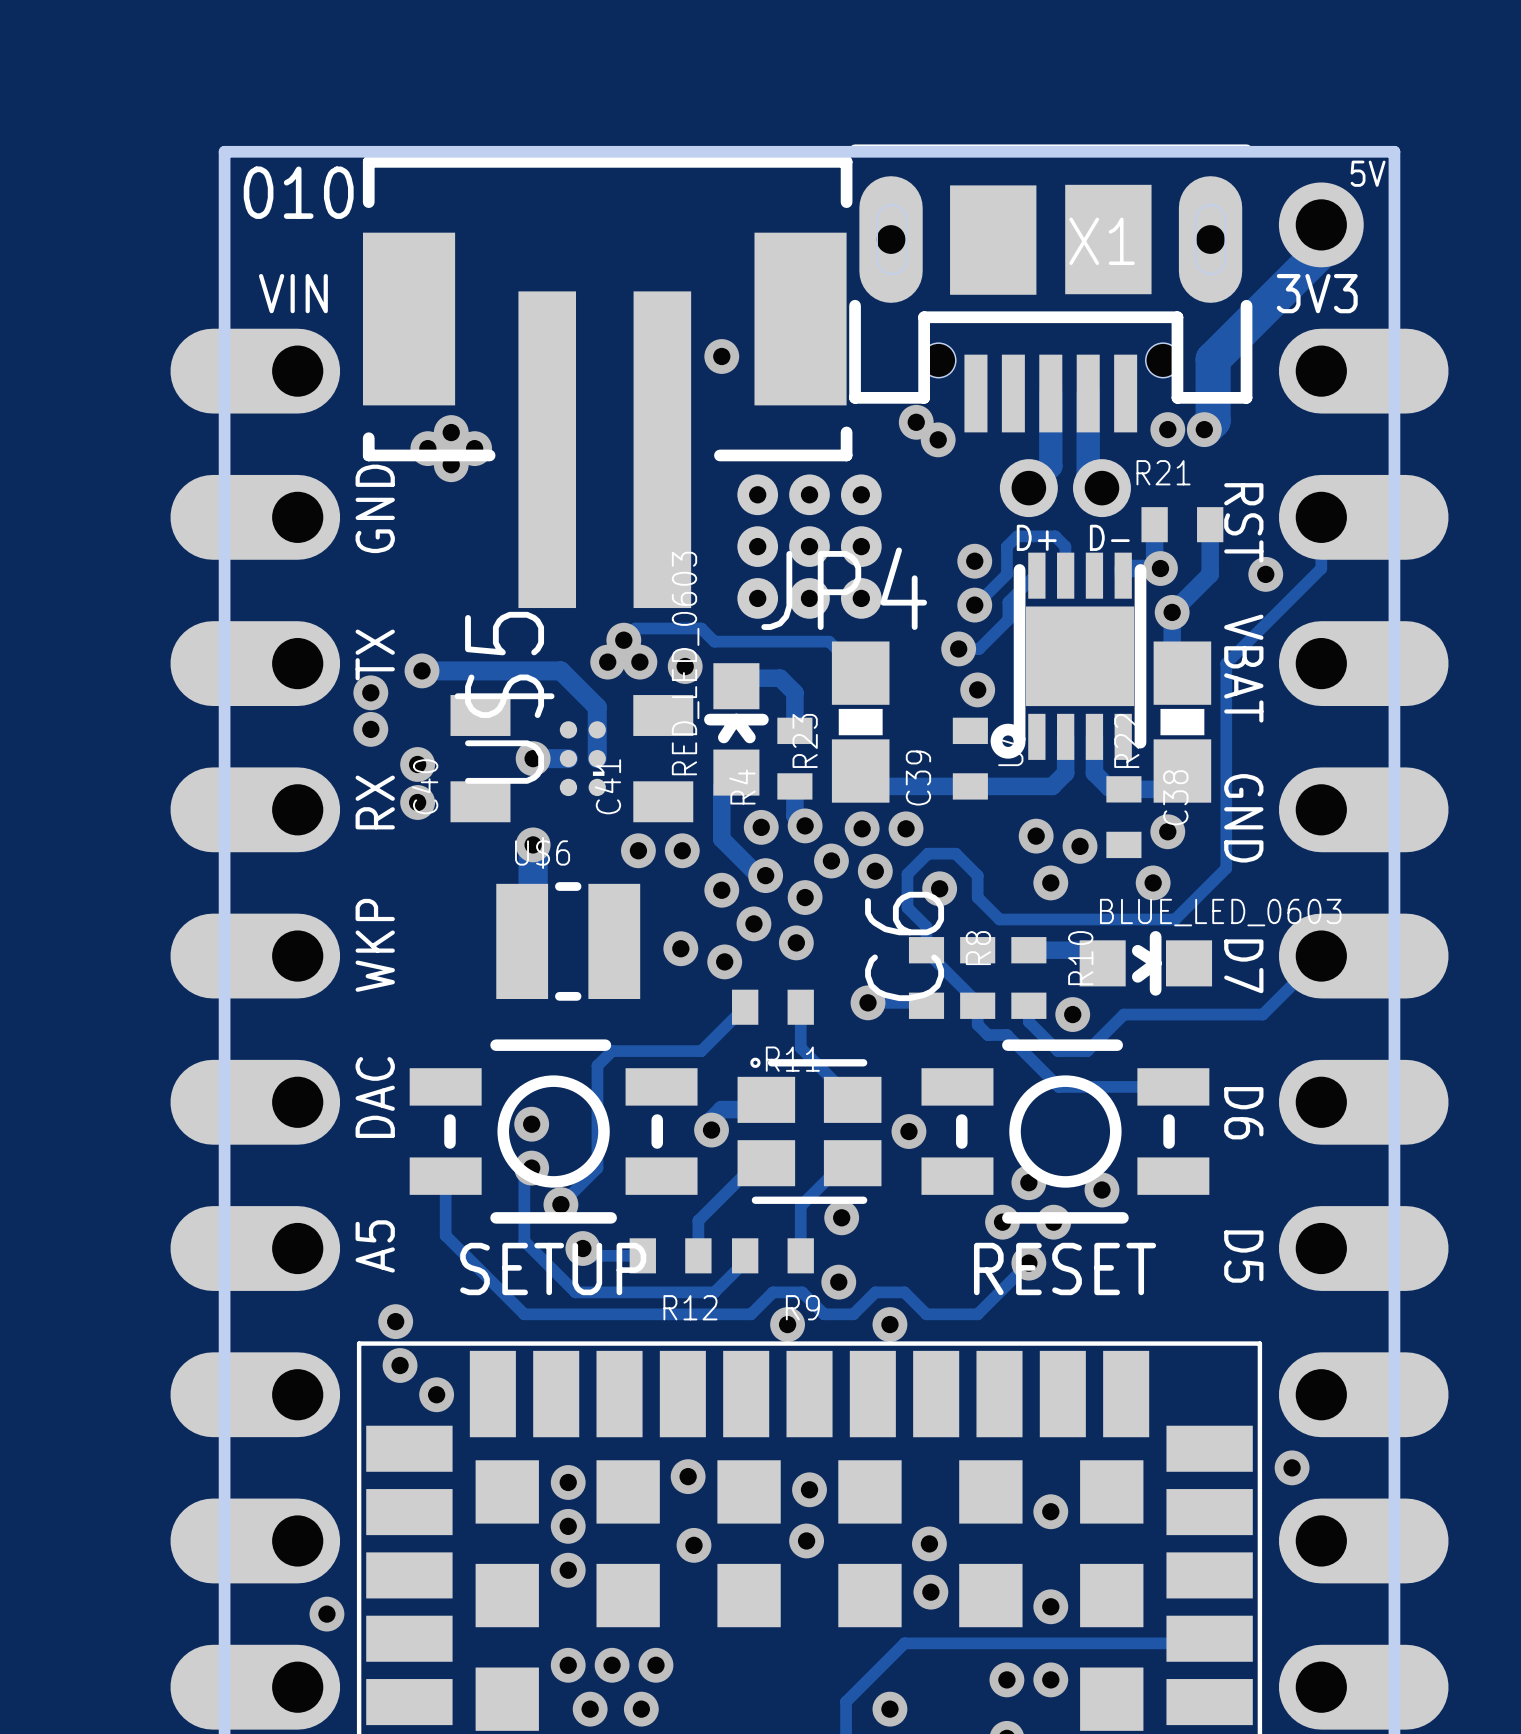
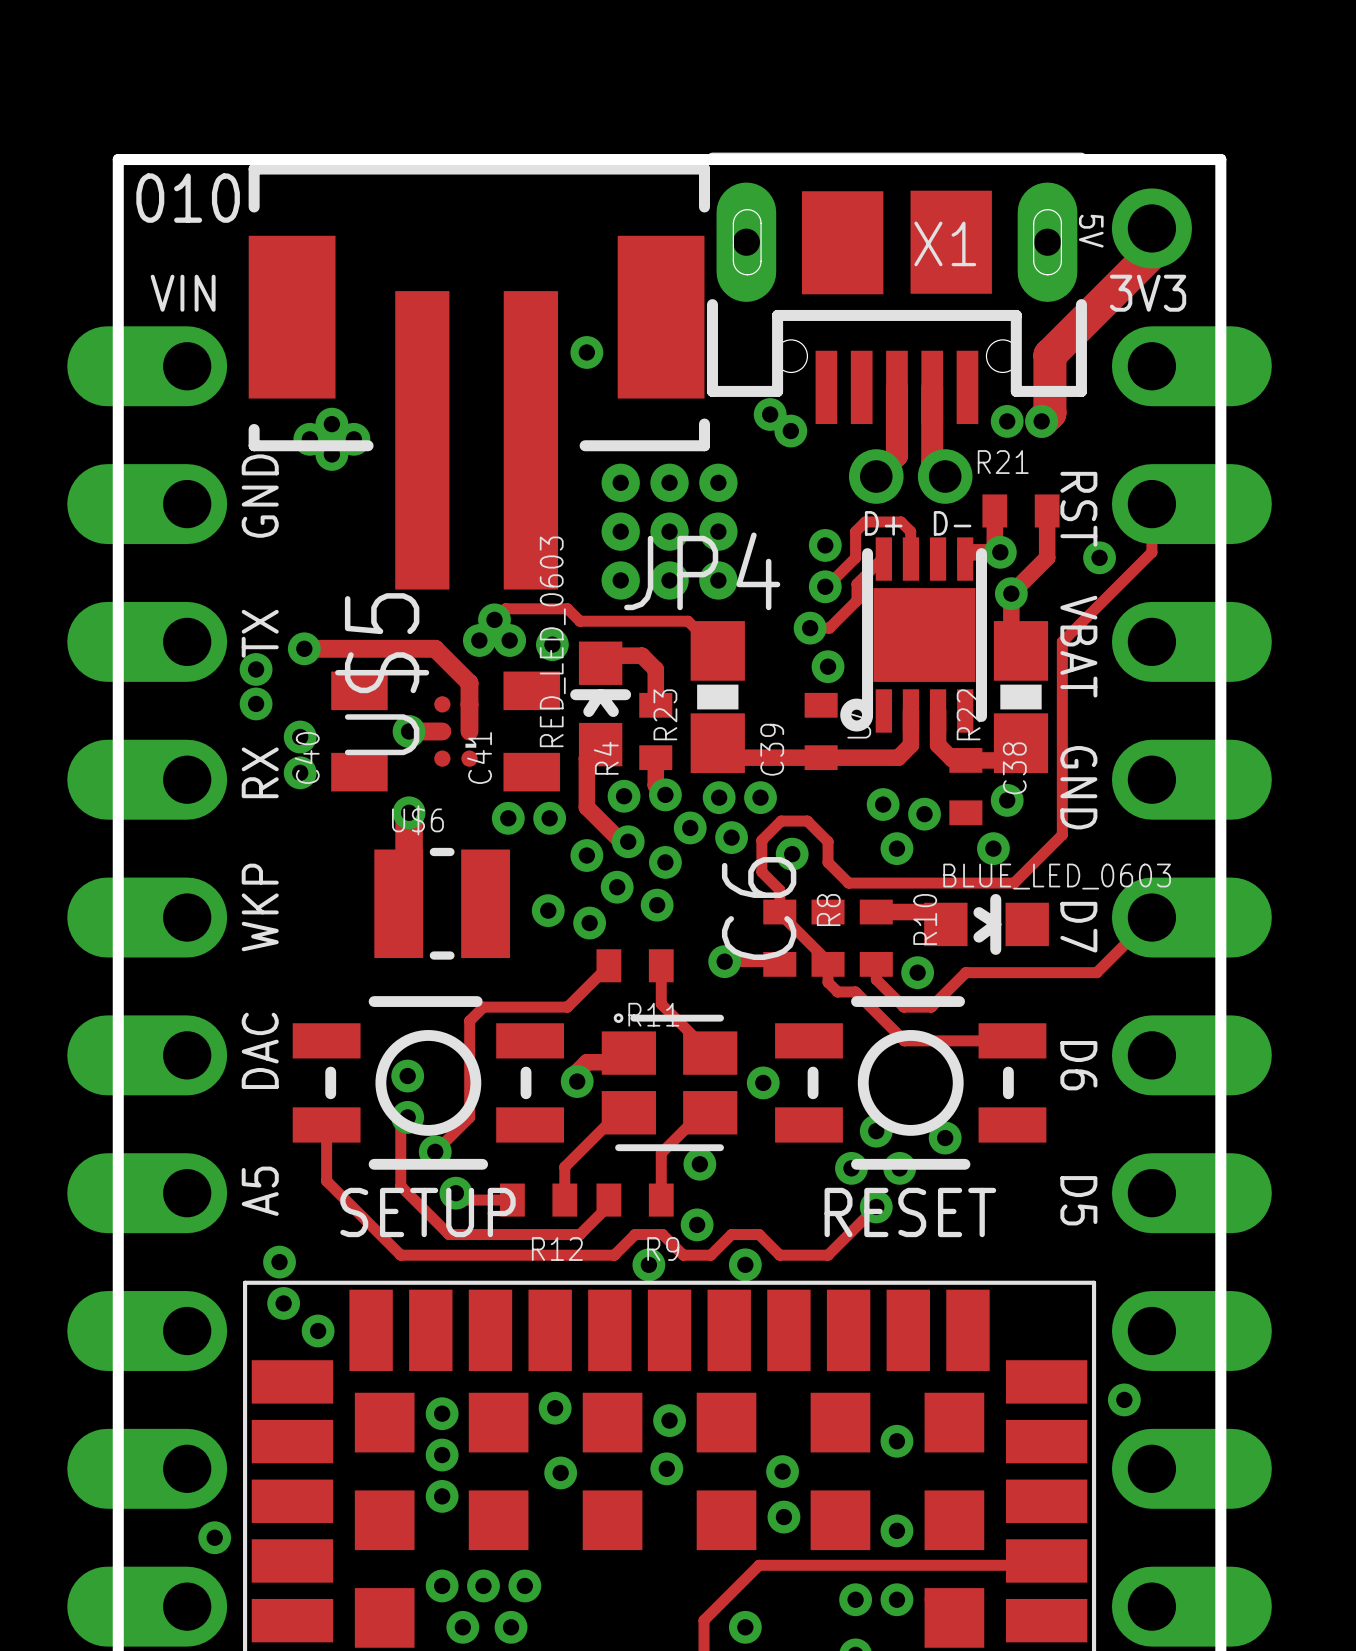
text rotation: 0° (1368, 173) -> 90° clockwise (1091, 231)
text position: 5V (1368, 173) -> 5V (1091, 231)

